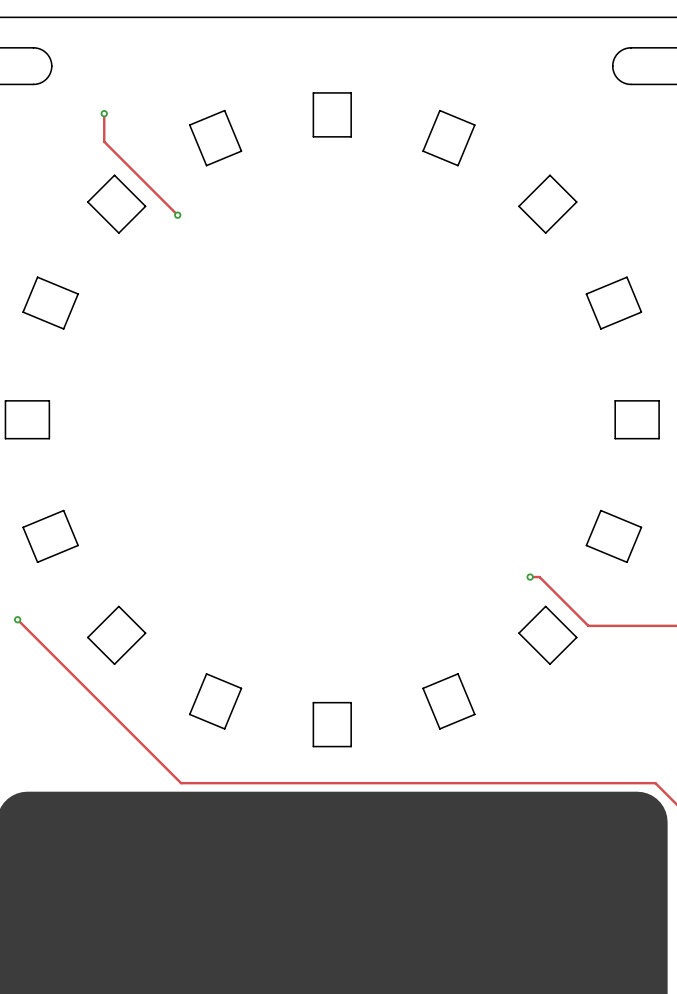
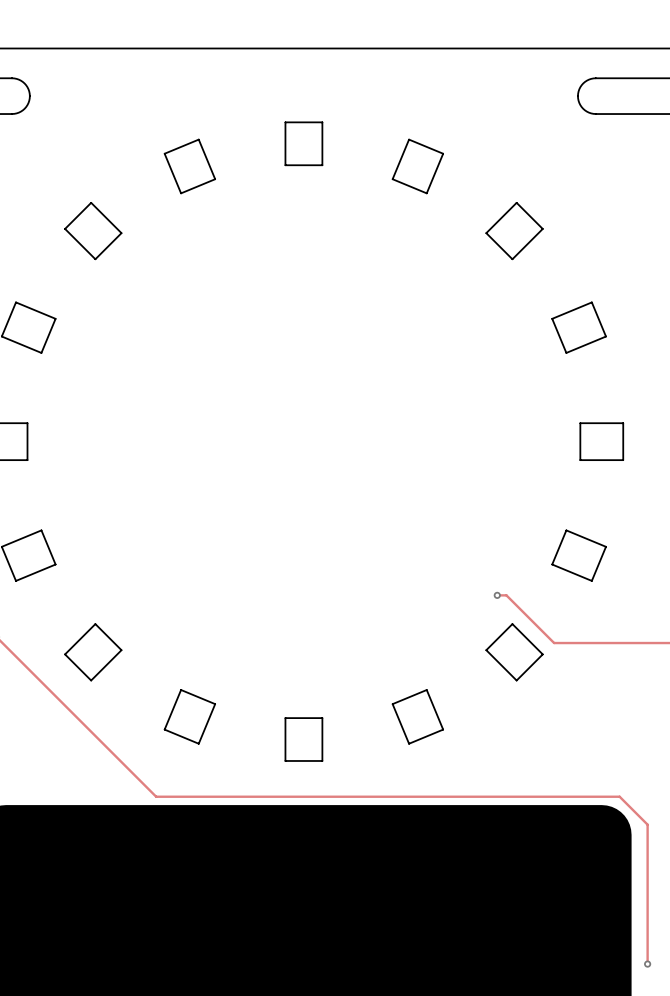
track: (104, 113) (104, 141) (177, 215) -> none
via: (104, 113) -> none
via: (177, 215) -> none

